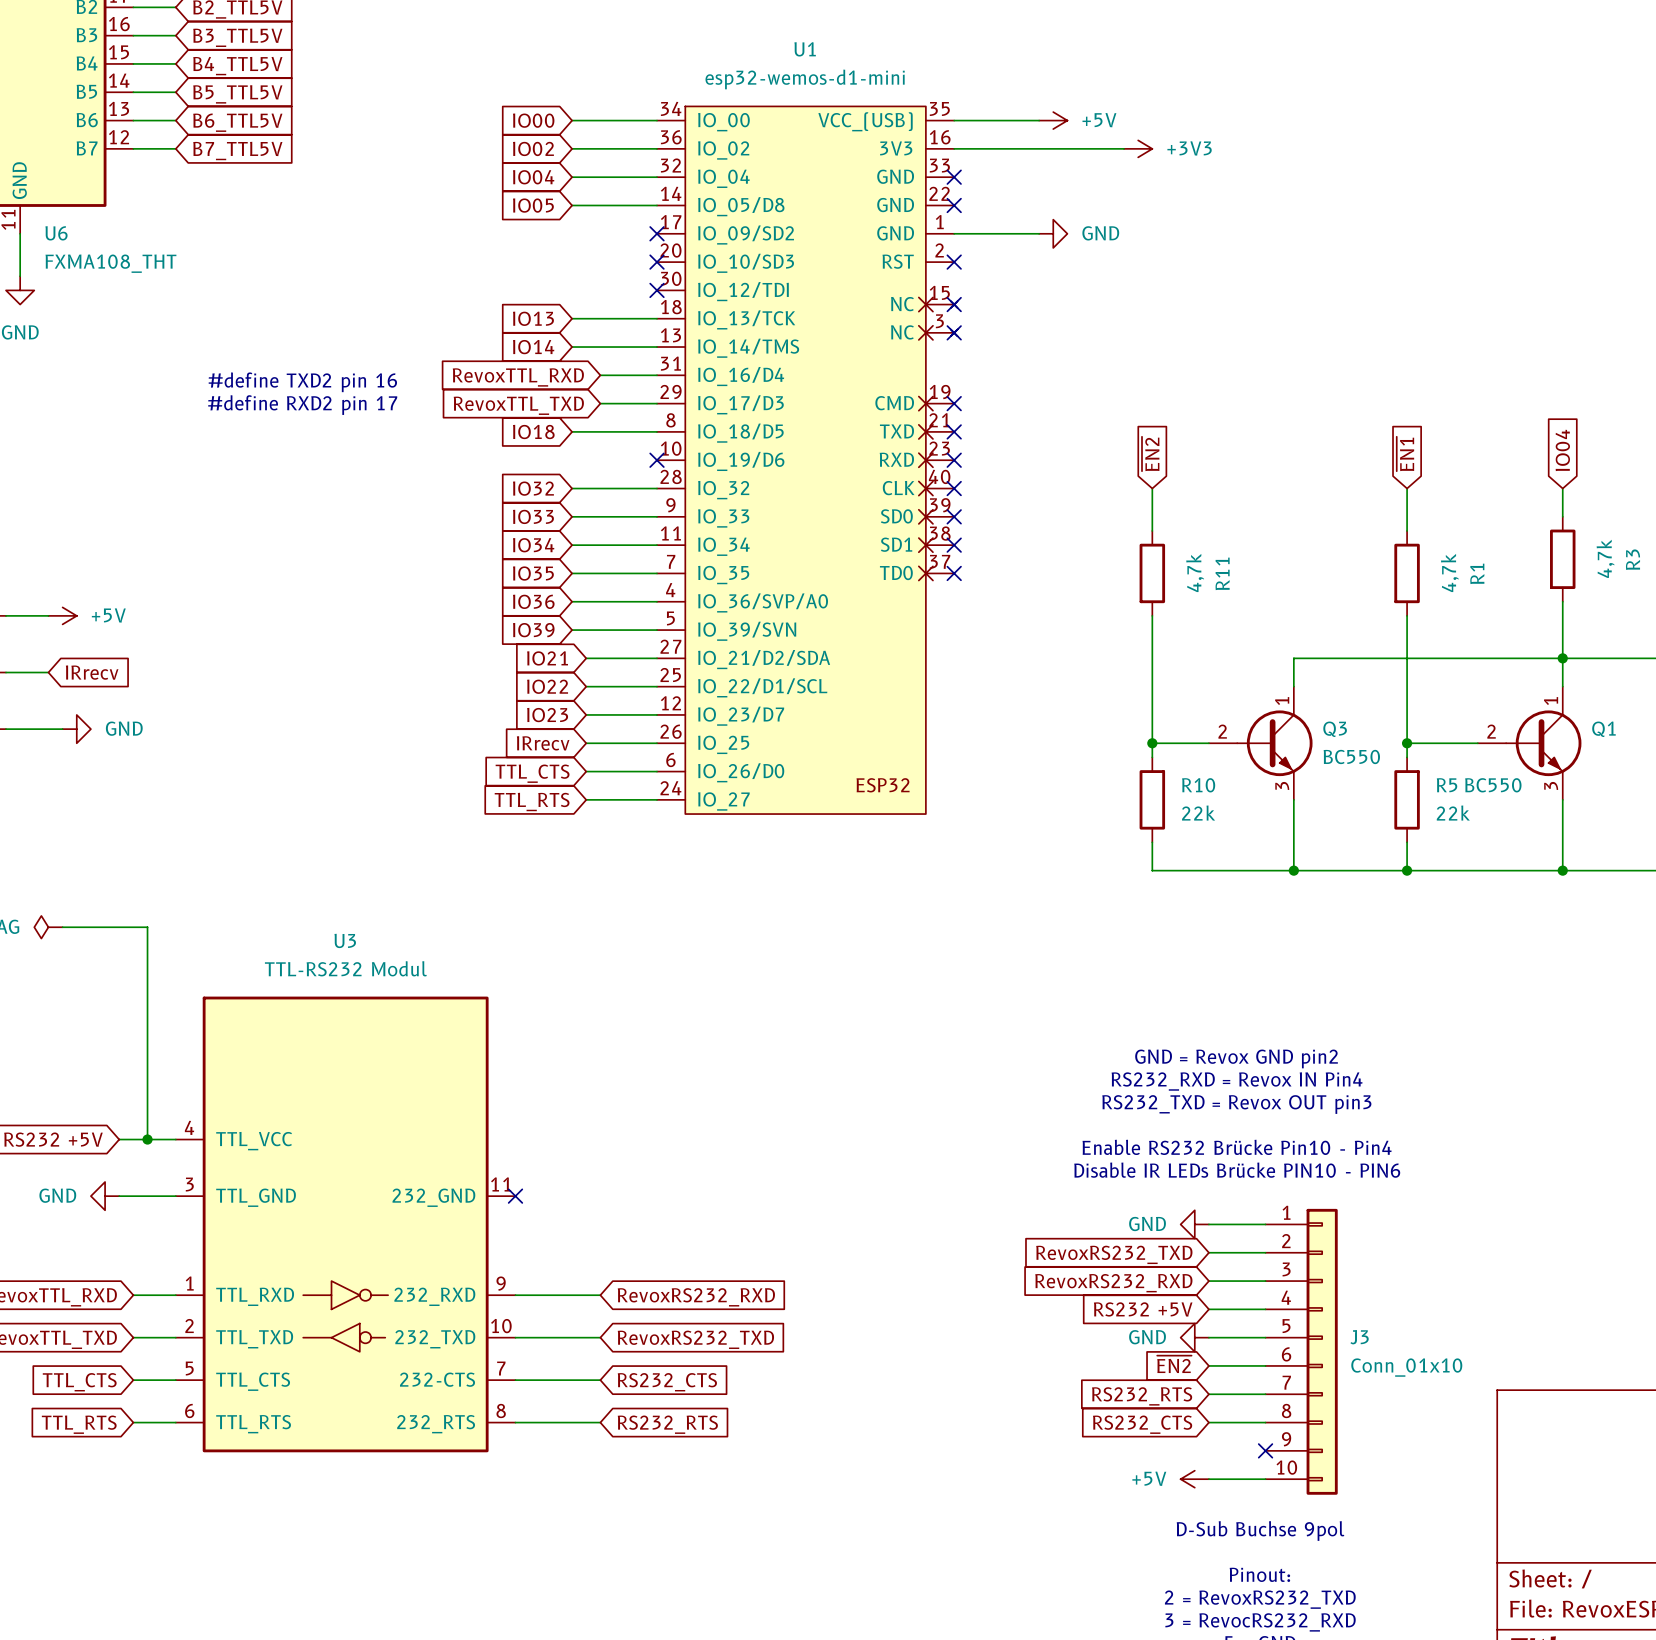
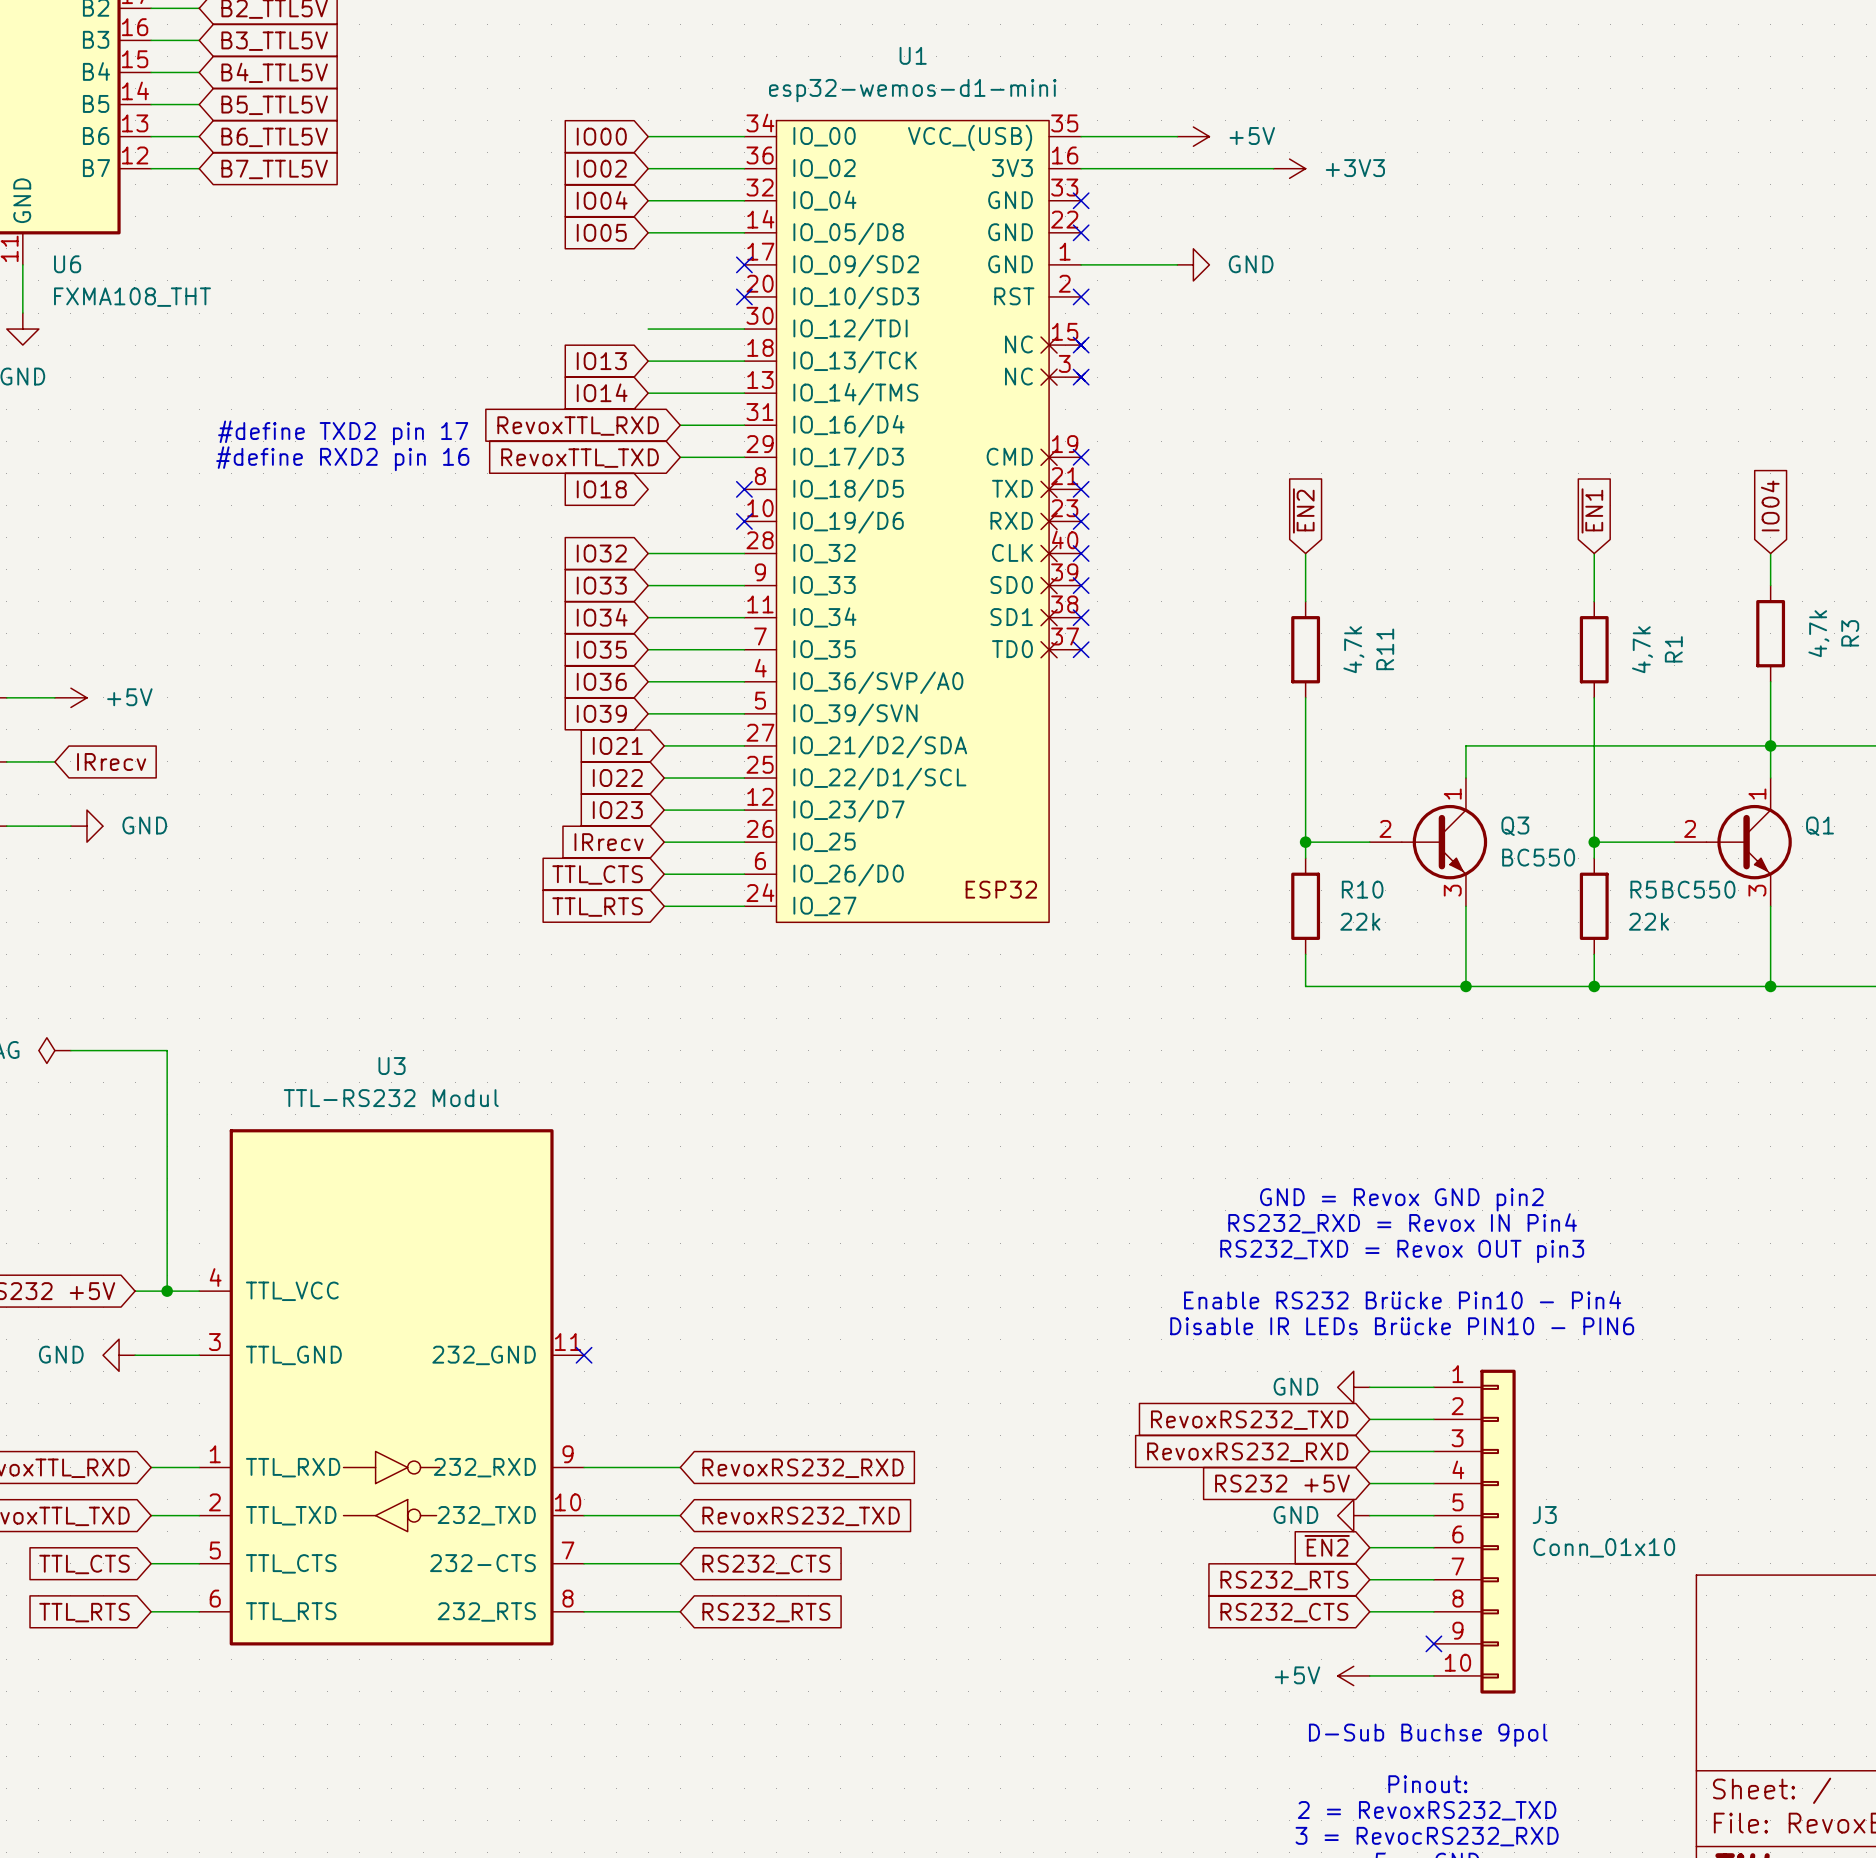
no-connect mark: (657, 290) -> none
text: #define TXD2 pin 16 (302, 382) -> #define TXD2 pin 17 (343, 432)
text: #define RXD2 pin 17 (302, 405) -> #define RXD2 pin 16 (342, 458)
wire: (572, 431) (657, 431) -> (648, 329) (744, 329)
no-connect mark: none -> (744, 489)

